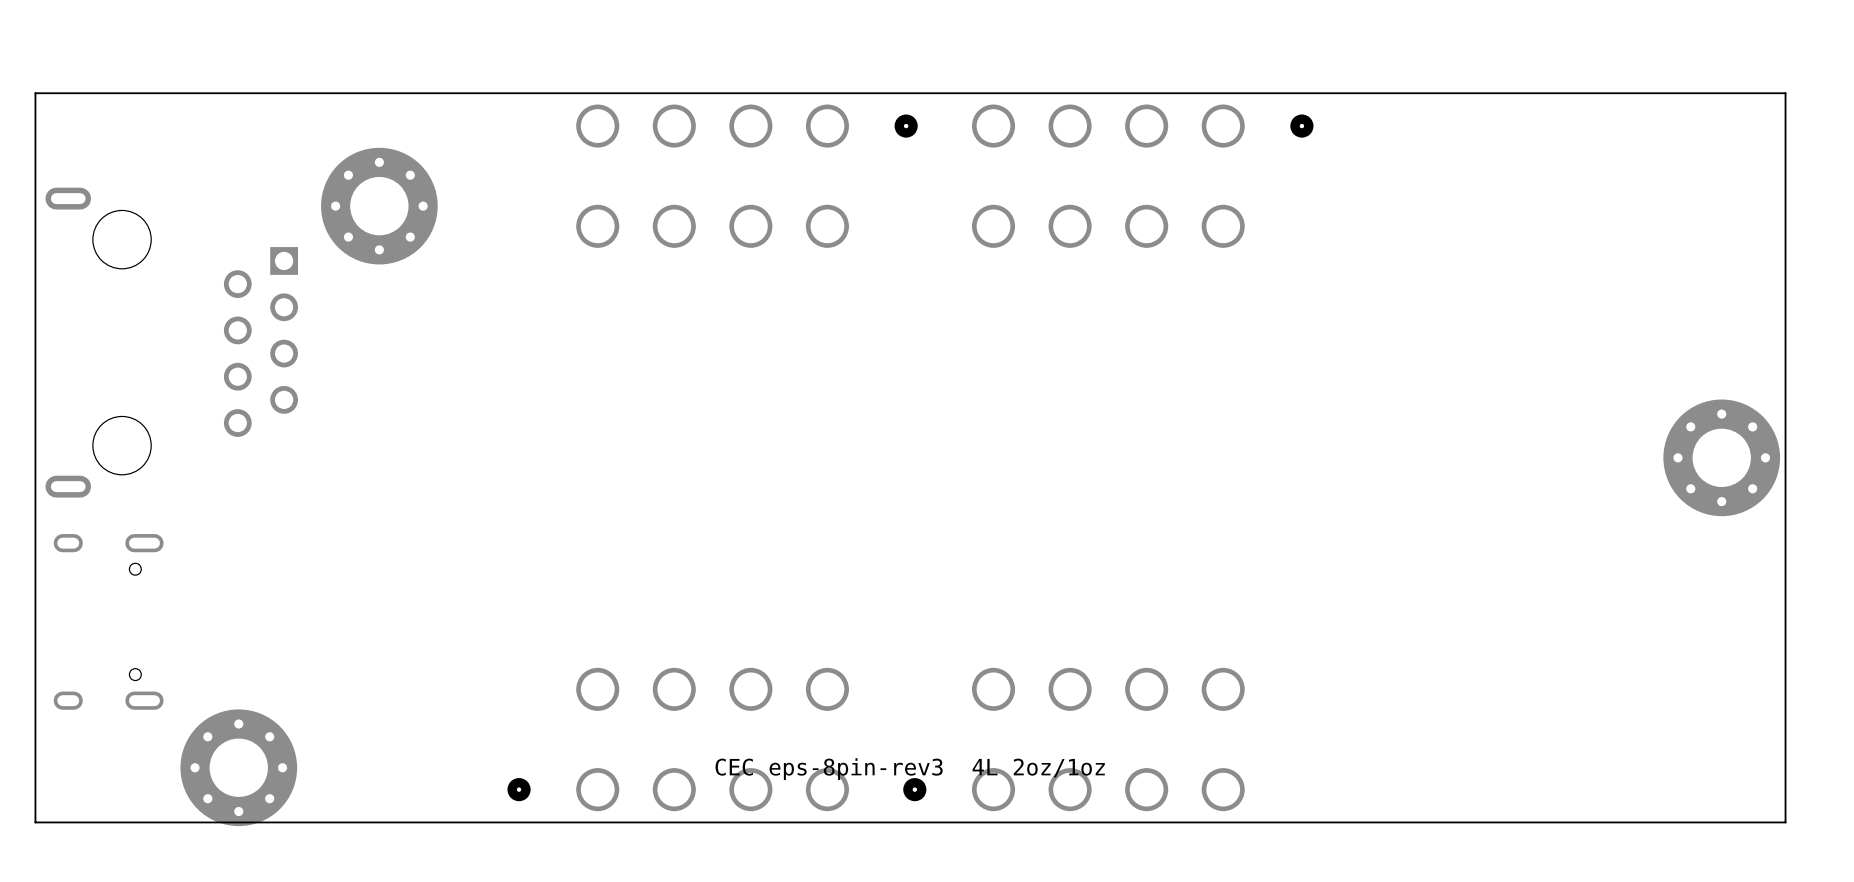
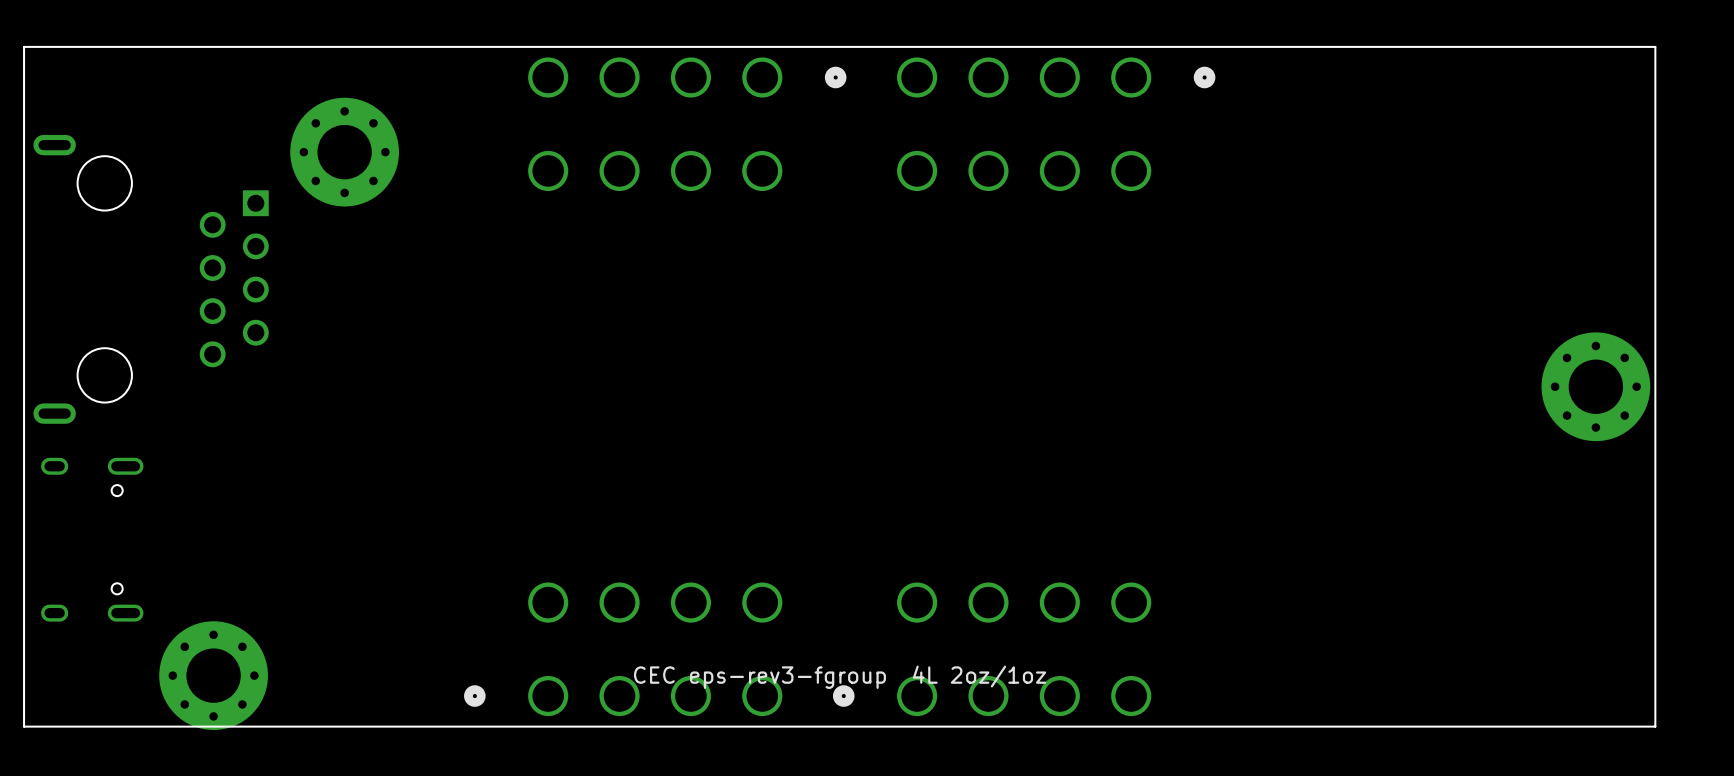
text: CEC eps-8pin-rev3 4L 2oz/1oz (910, 769) -> CEC eps-rev3-fgroup 4L 2oz/1oz (840, 677)

